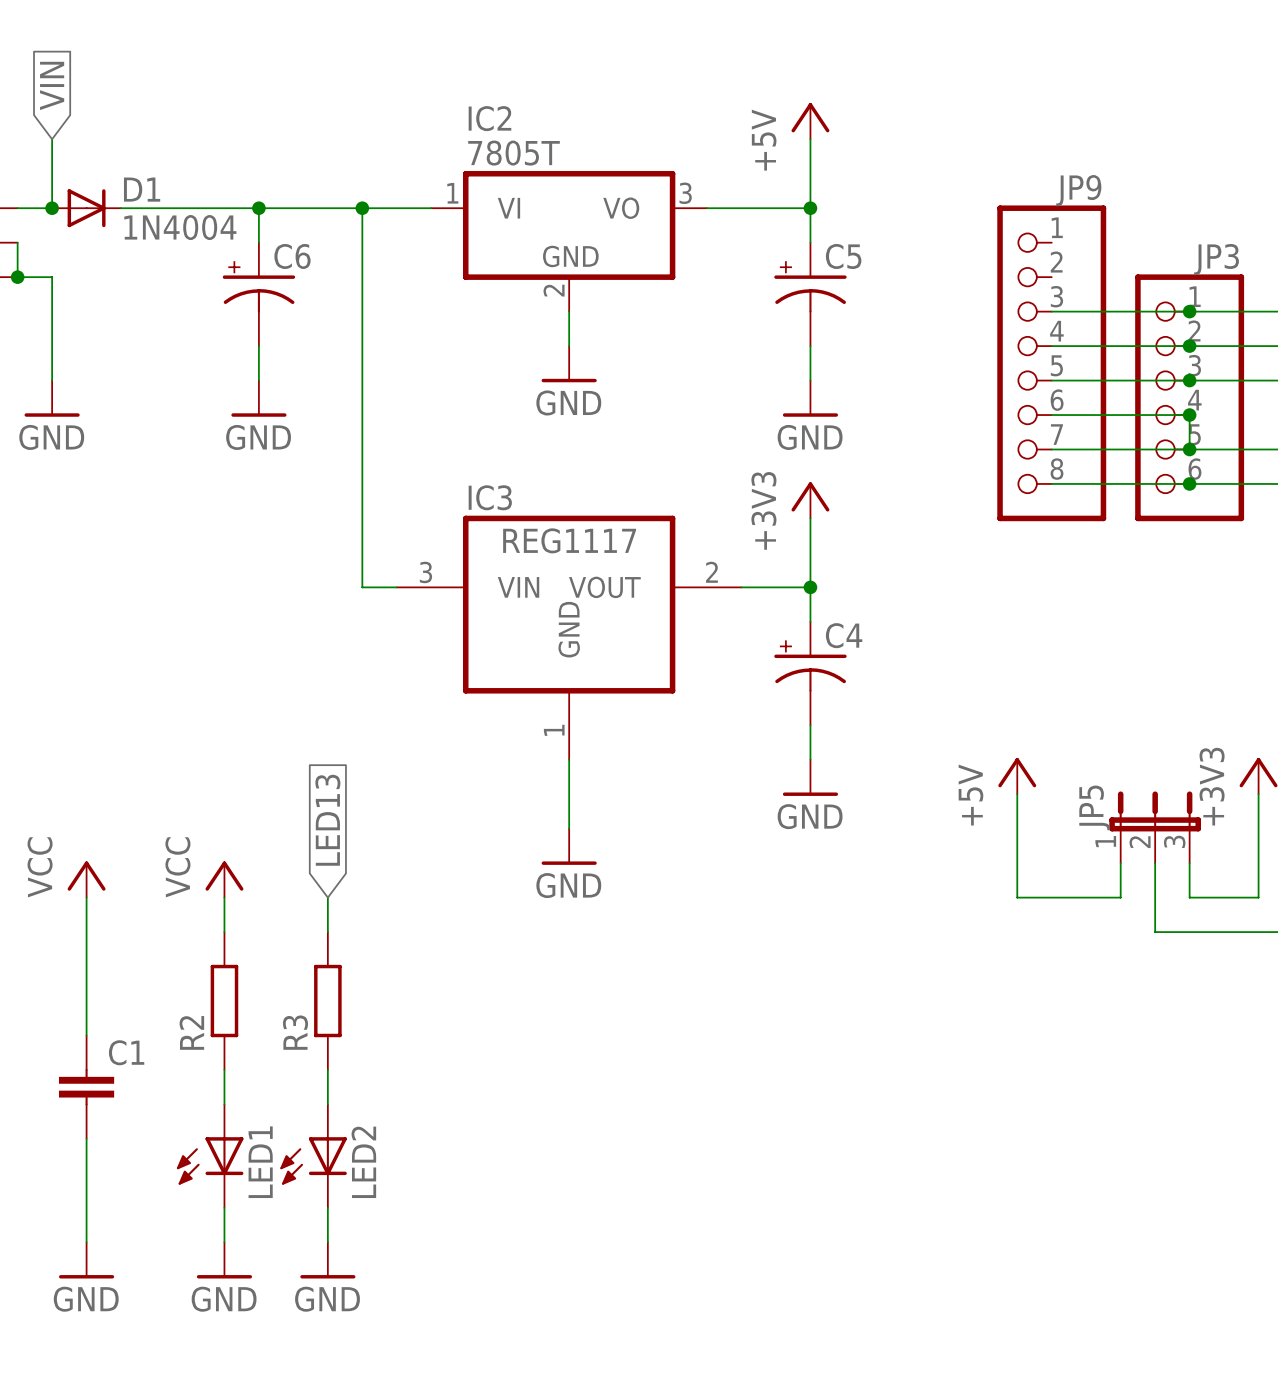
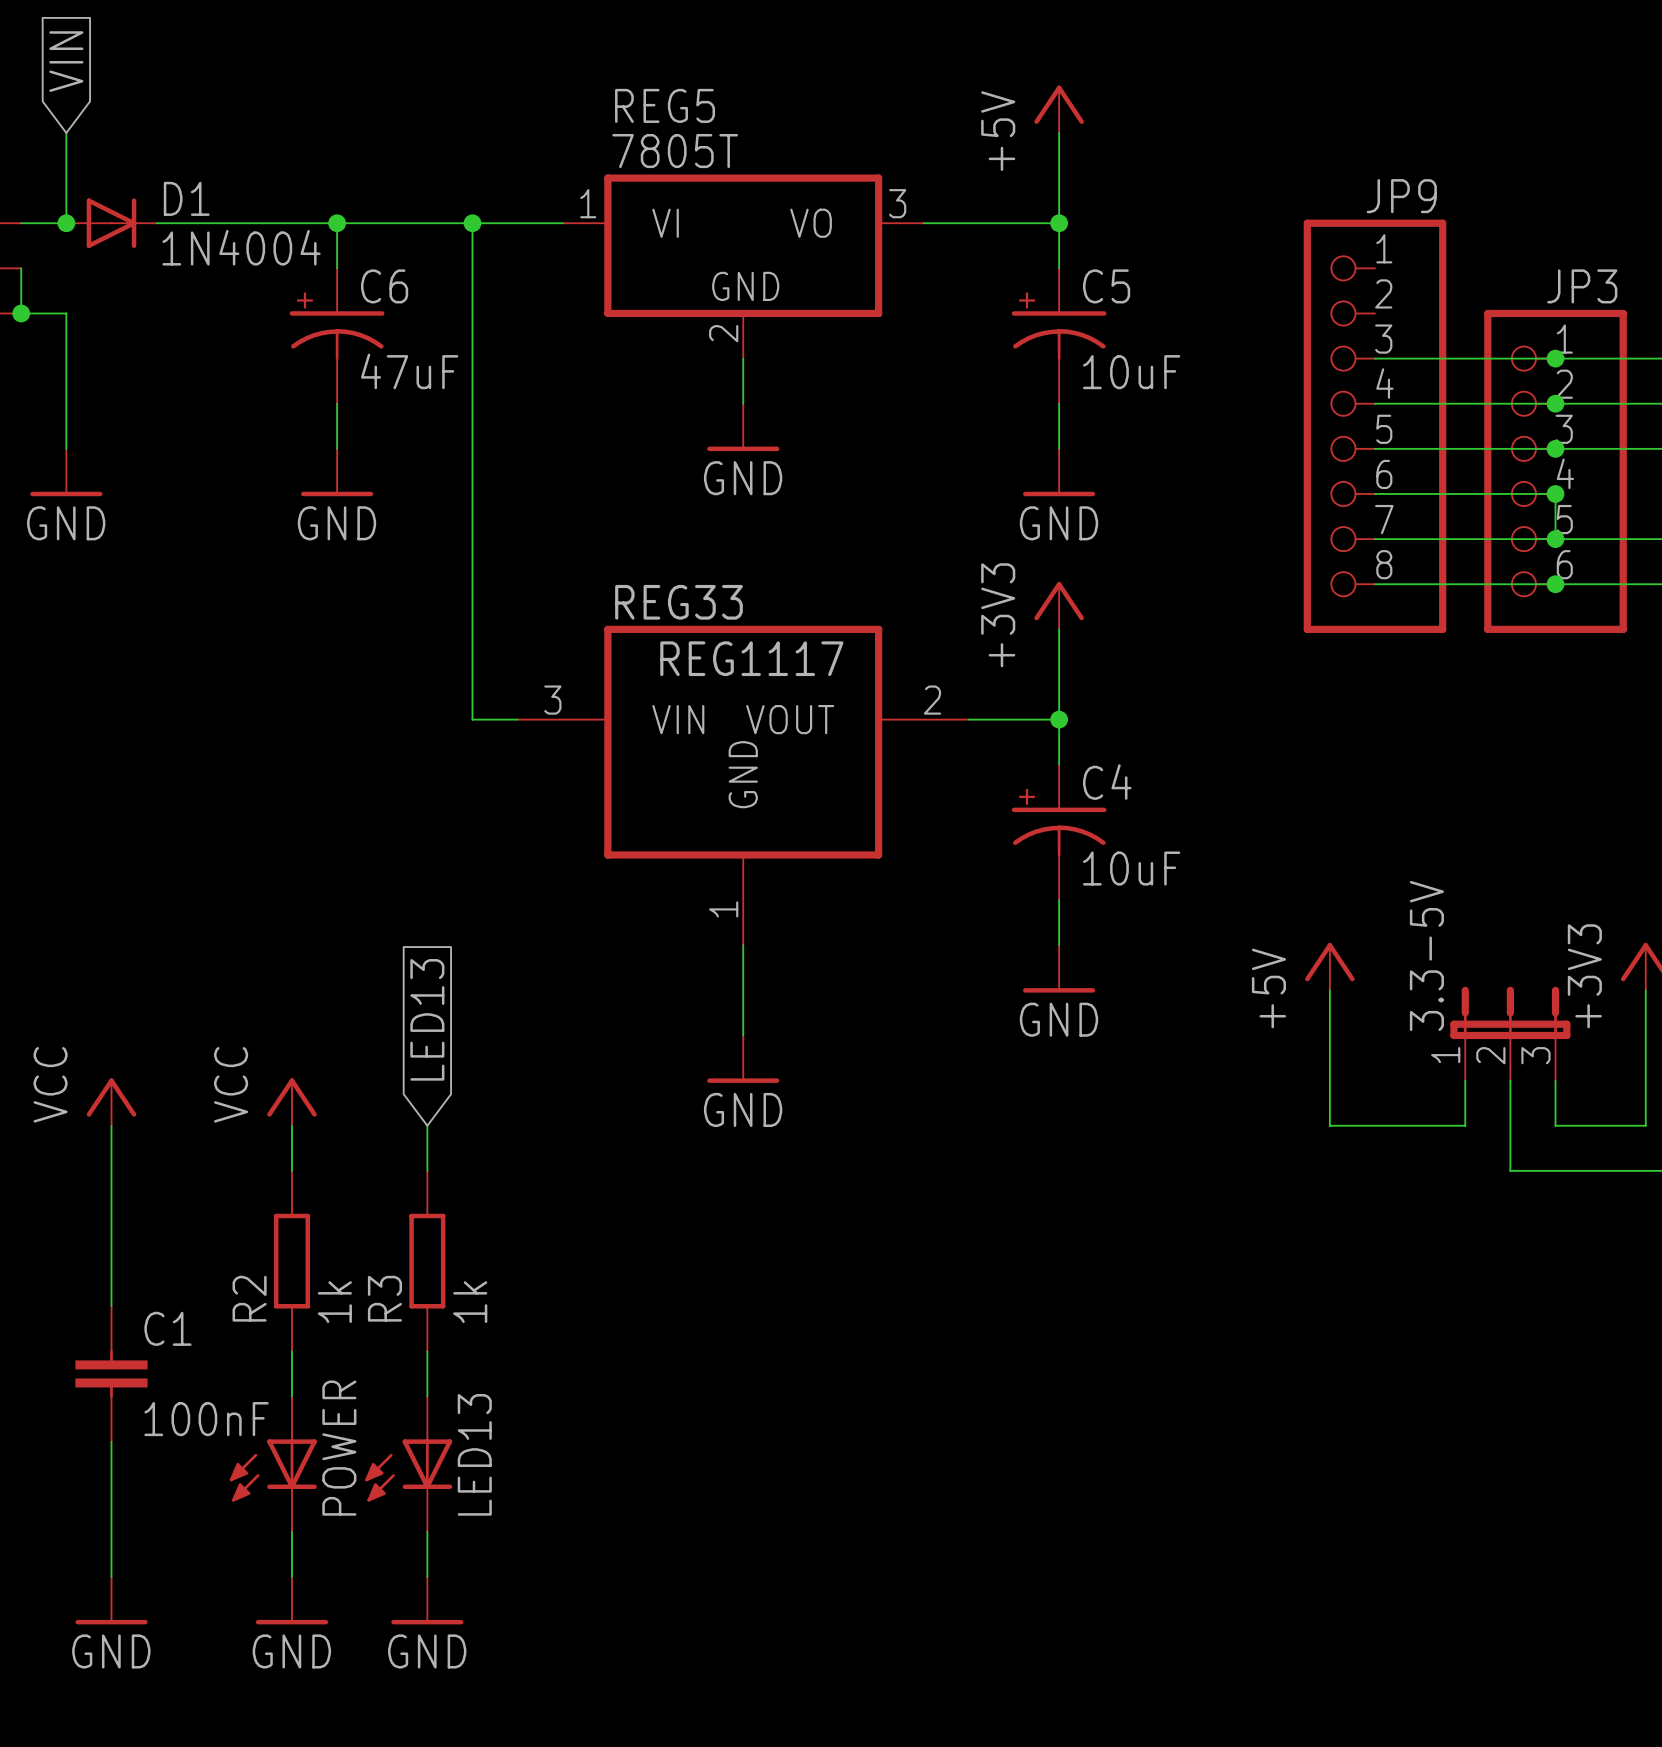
IC2 name: IC2 (489, 118) -> REG5 (665, 105)
C5 value: none -> 10uF (1131, 372)
C6 value: none -> 47uF (409, 371)
IC3 name: IC3 (490, 497) -> REG33 (678, 602)
C4 value: none -> 10uF (1131, 868)
JP5 name: JP5 (1094, 807) -> 3.3-5V (1426, 955)
R2 value: none -> 1k (334, 1302)
R3 value: none -> 1k (470, 1302)
C1 value: none -> 100nF (206, 1419)
LED1 name: LED1 (260, 1162) -> POWER (339, 1448)
LED2 name: LED2 (363, 1162) -> LED13 (474, 1454)

